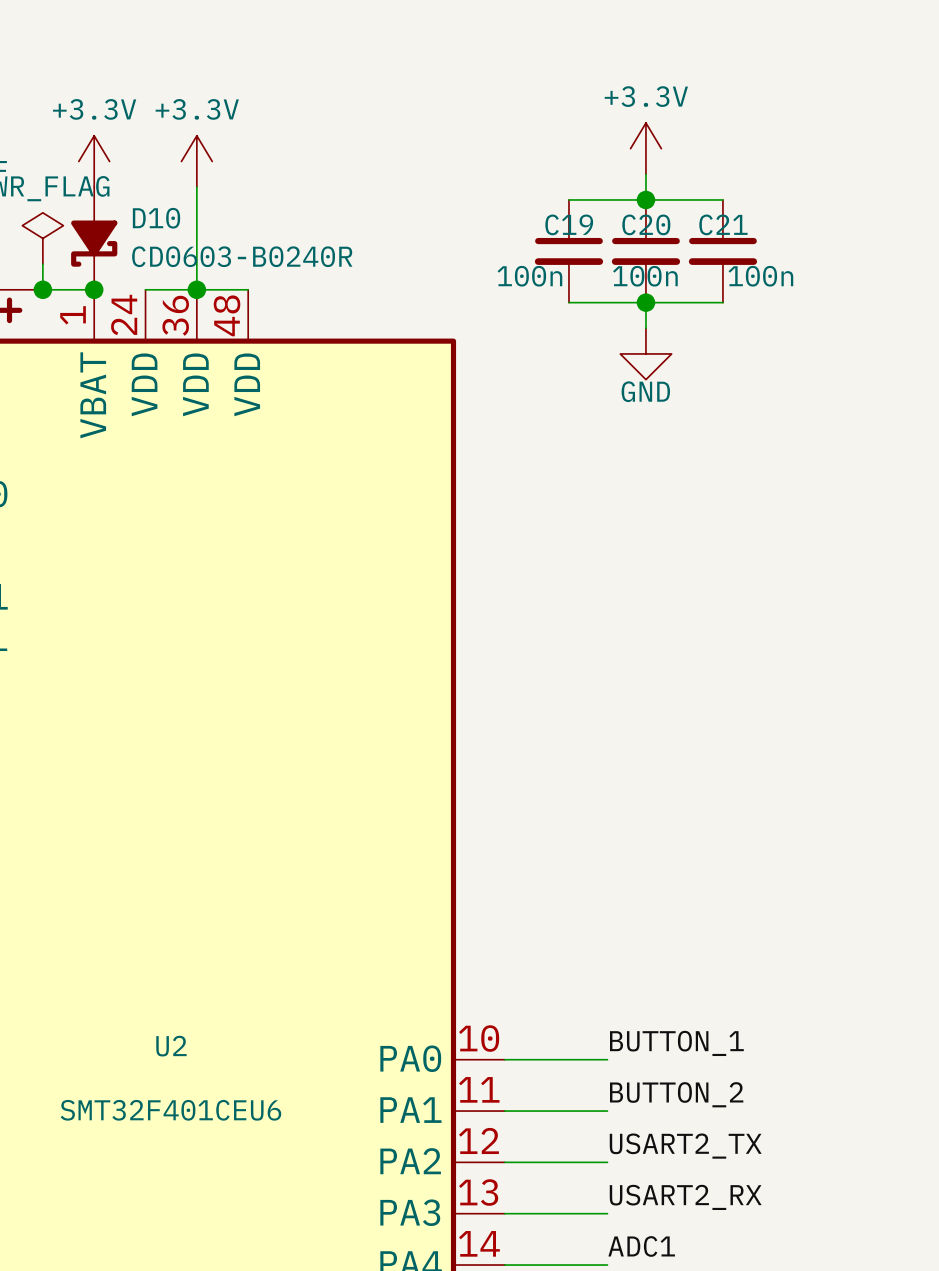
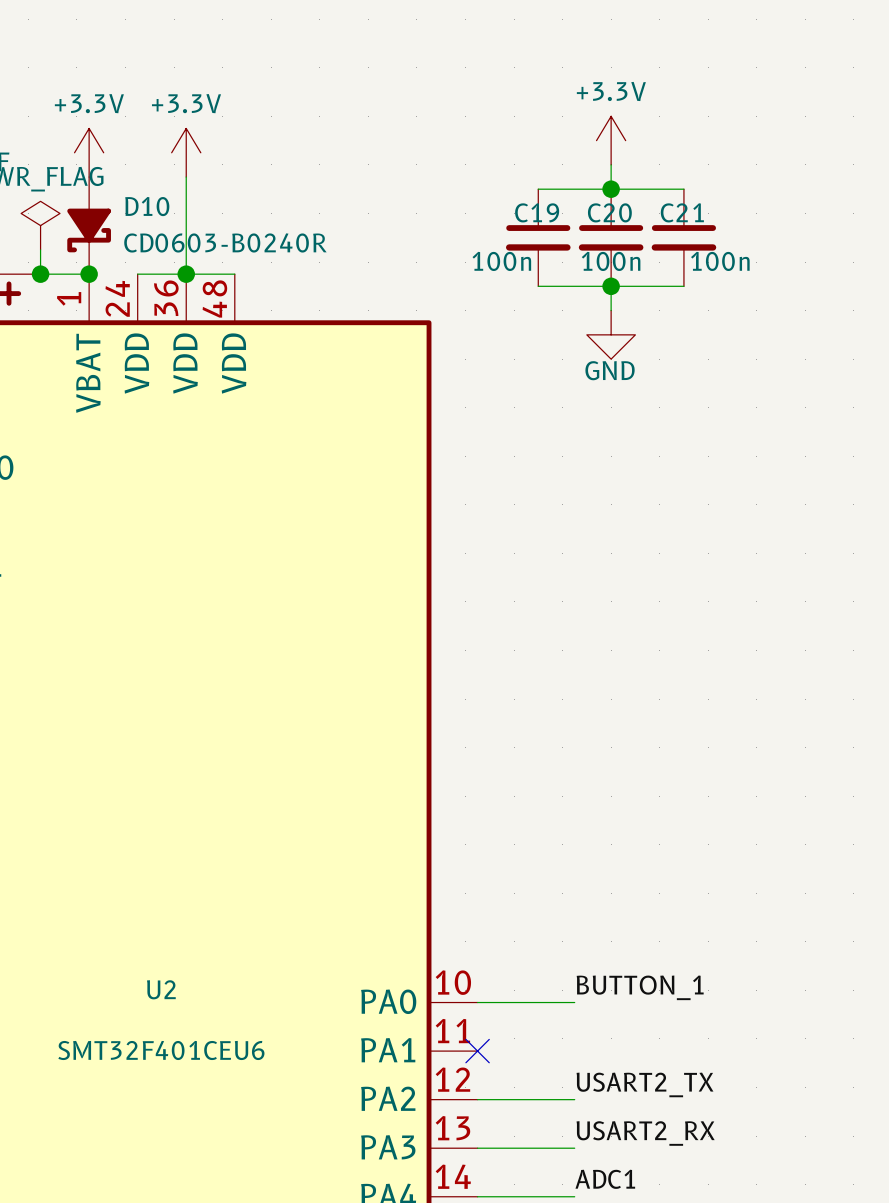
label: BUTTON_2 (676, 1094) -> none
wire: (504, 1111) (607, 1111) -> none
no-connect mark: none -> (477, 1051)

